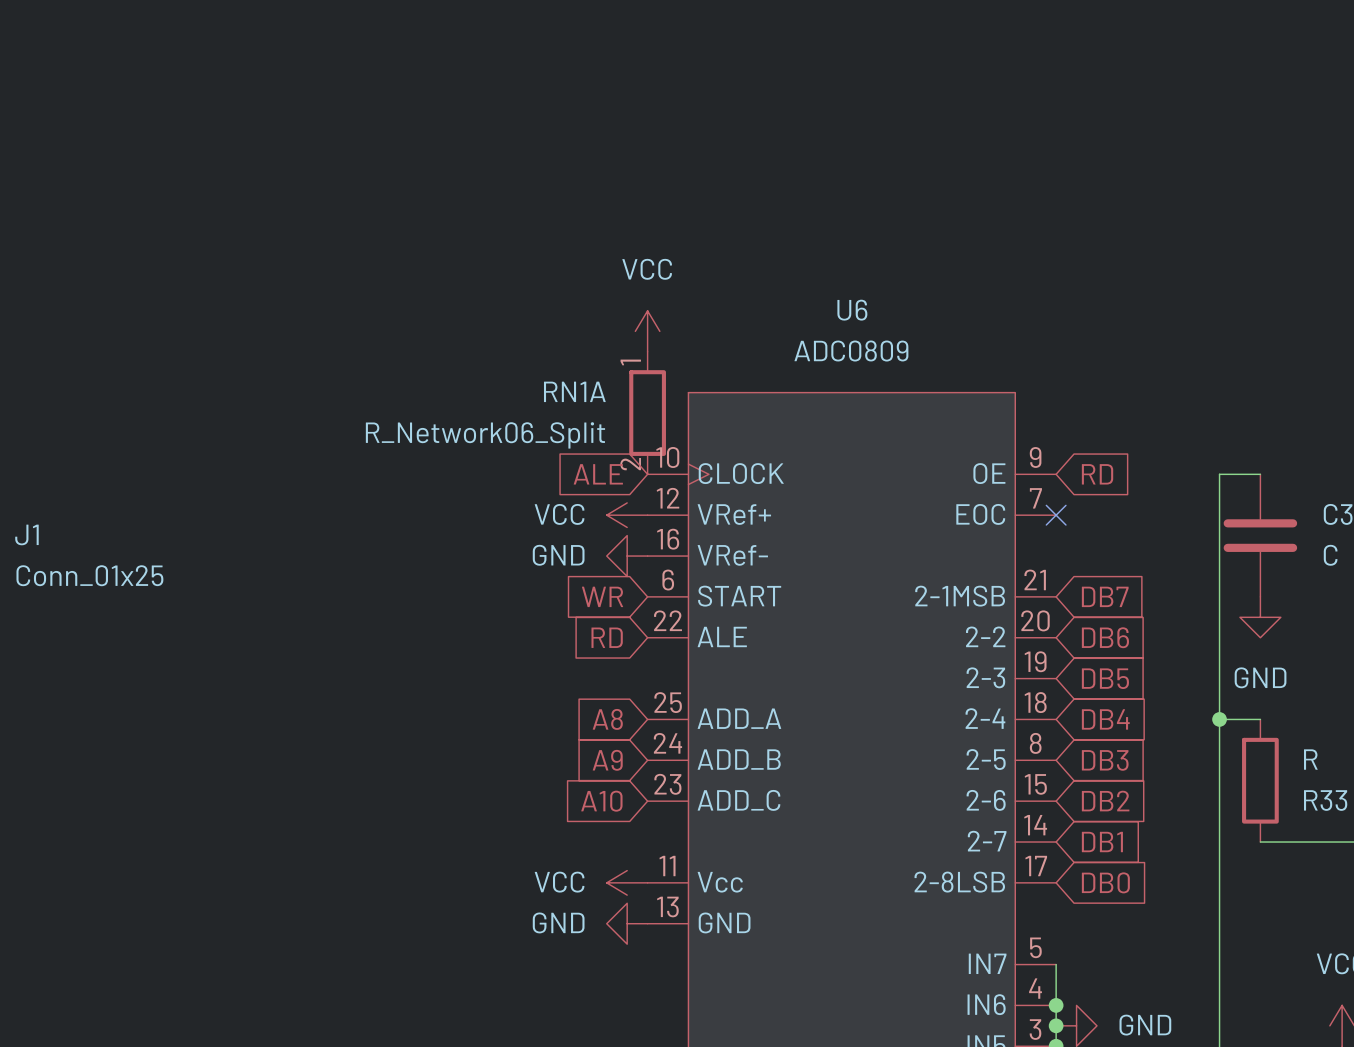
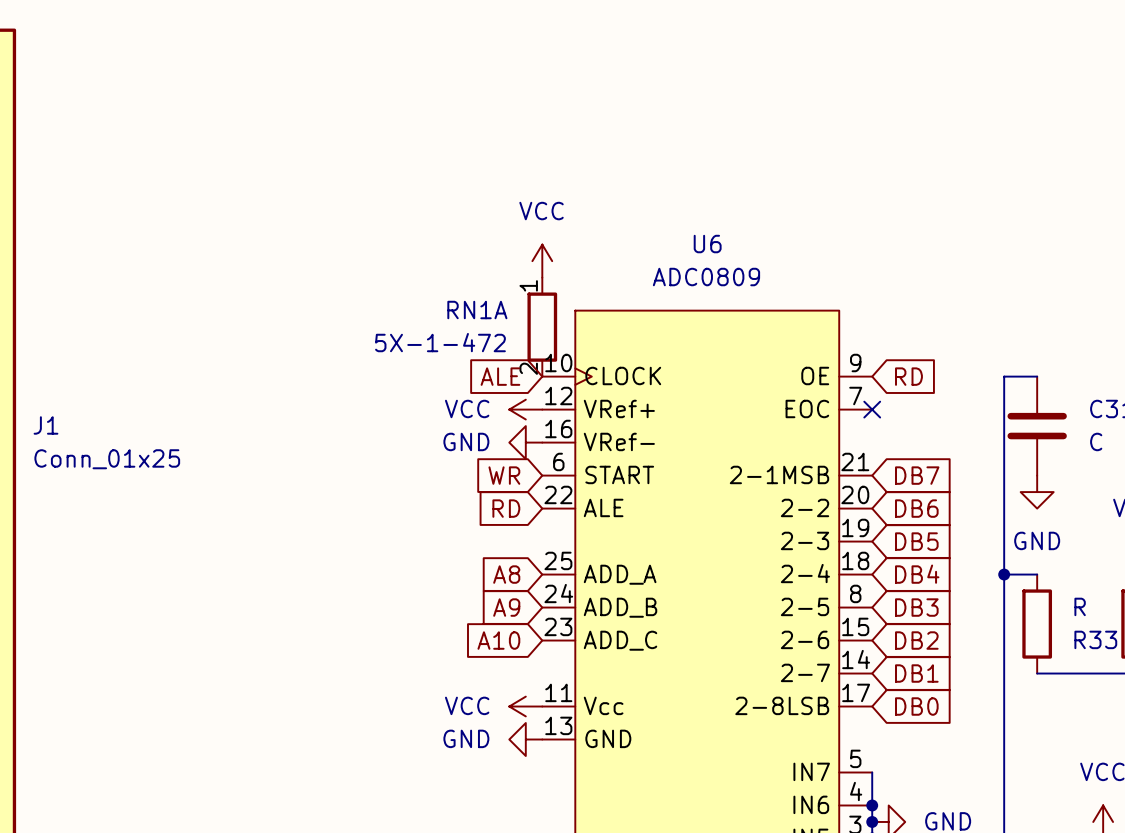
RN1A value: R_Network06_Split (485, 435) -> 5X-1-472 (440, 342)

